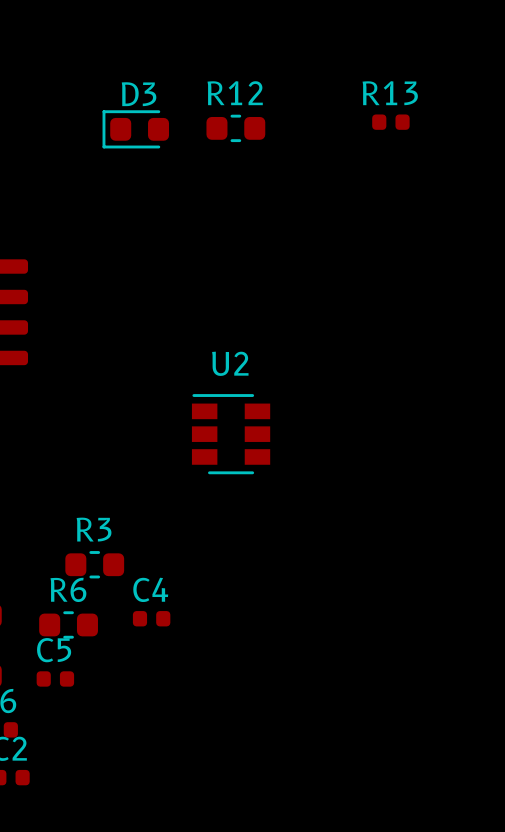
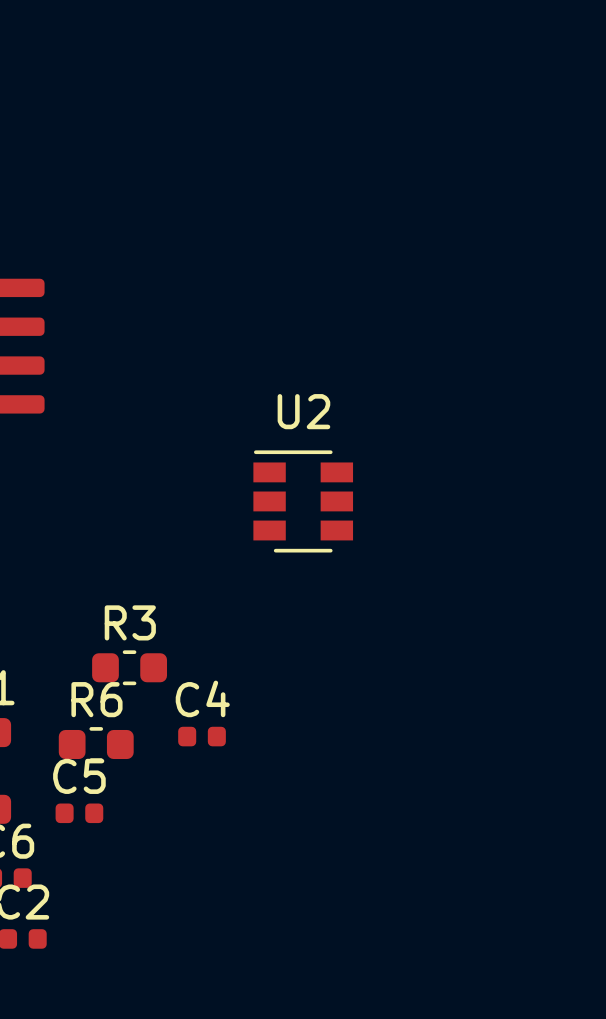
R13: (390, 122) -> none
R12: (235, 128) -> none
D3: (135, 129) -> none

